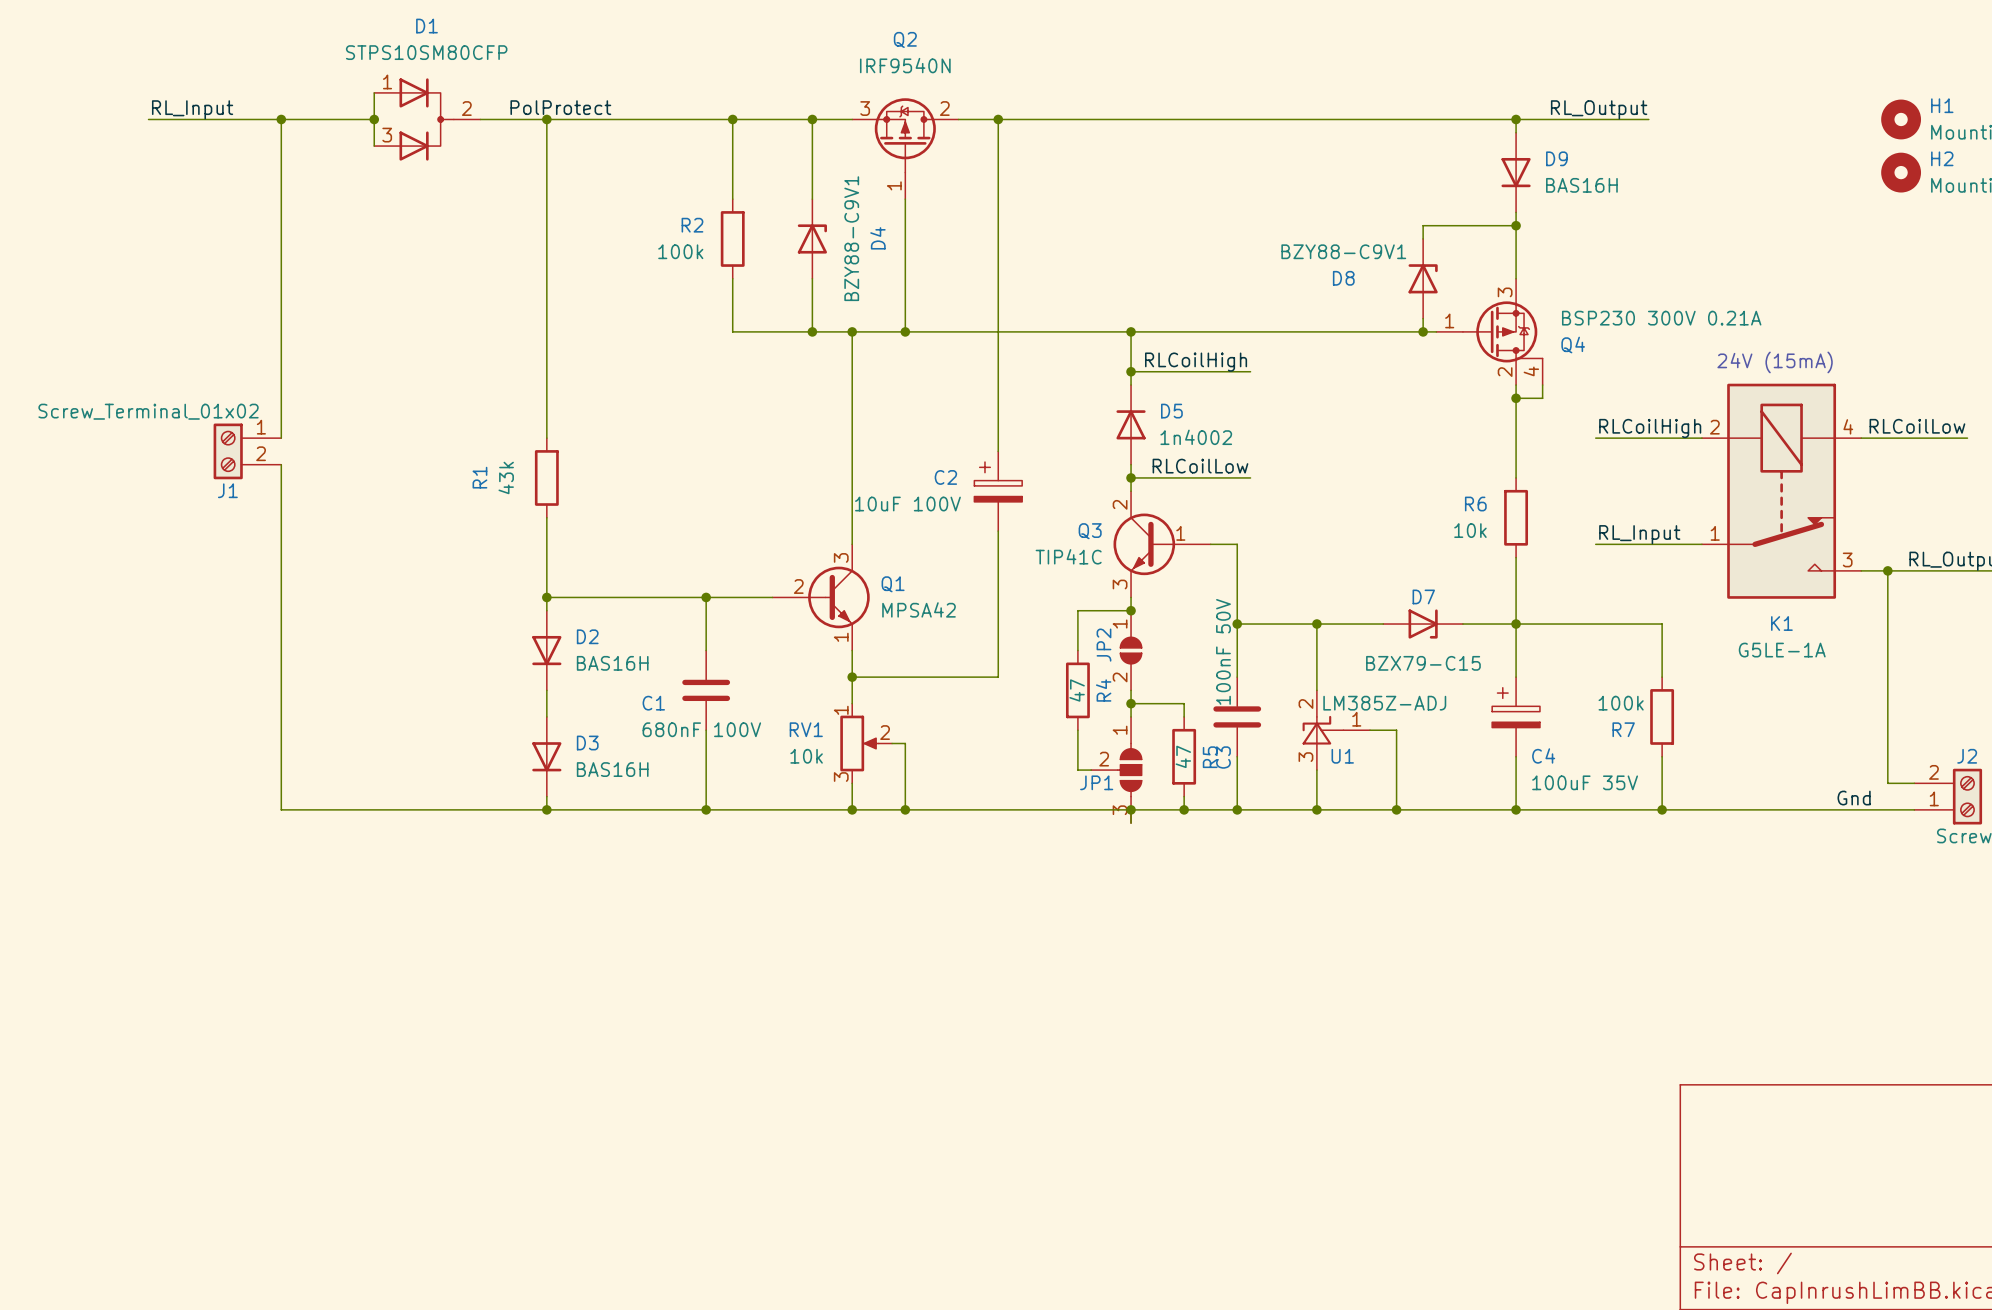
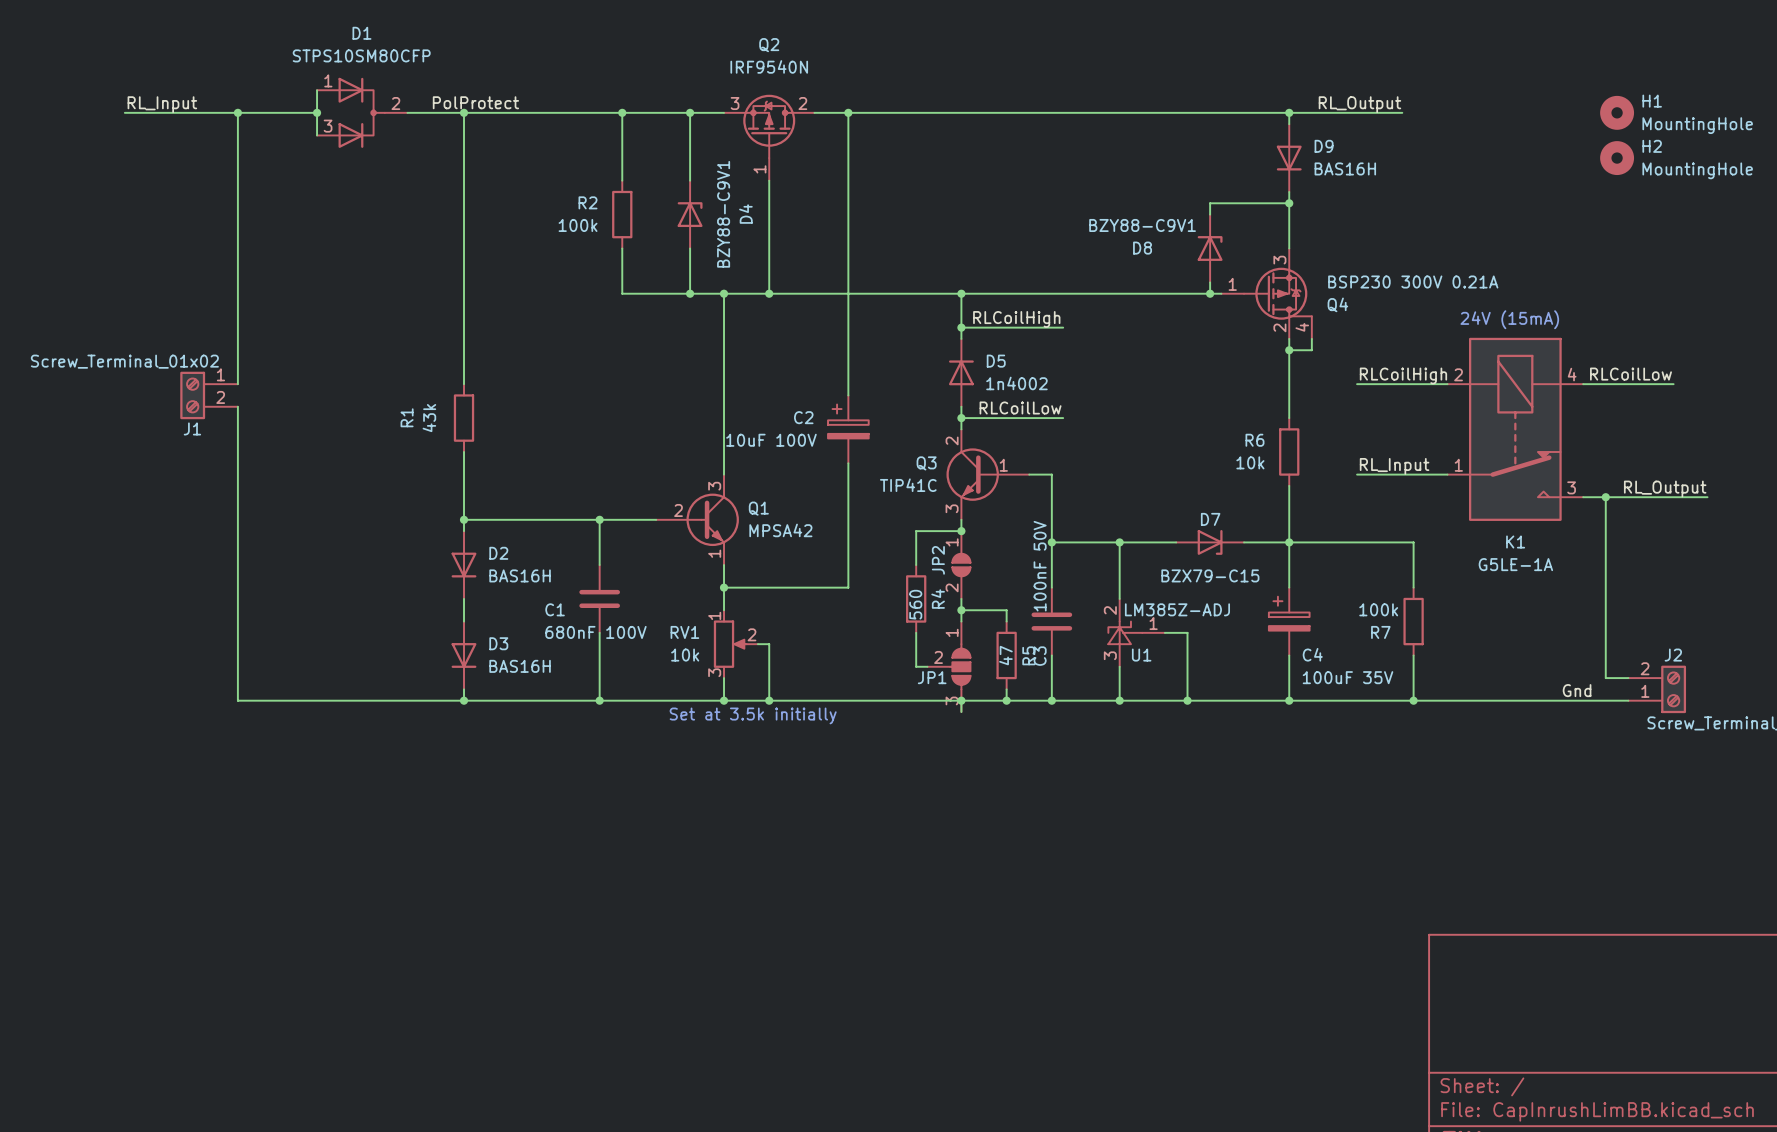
R4 value: 47 (1077, 690) -> 560 (915, 604)
text: none -> Set at 3.5k initially (753, 715)

